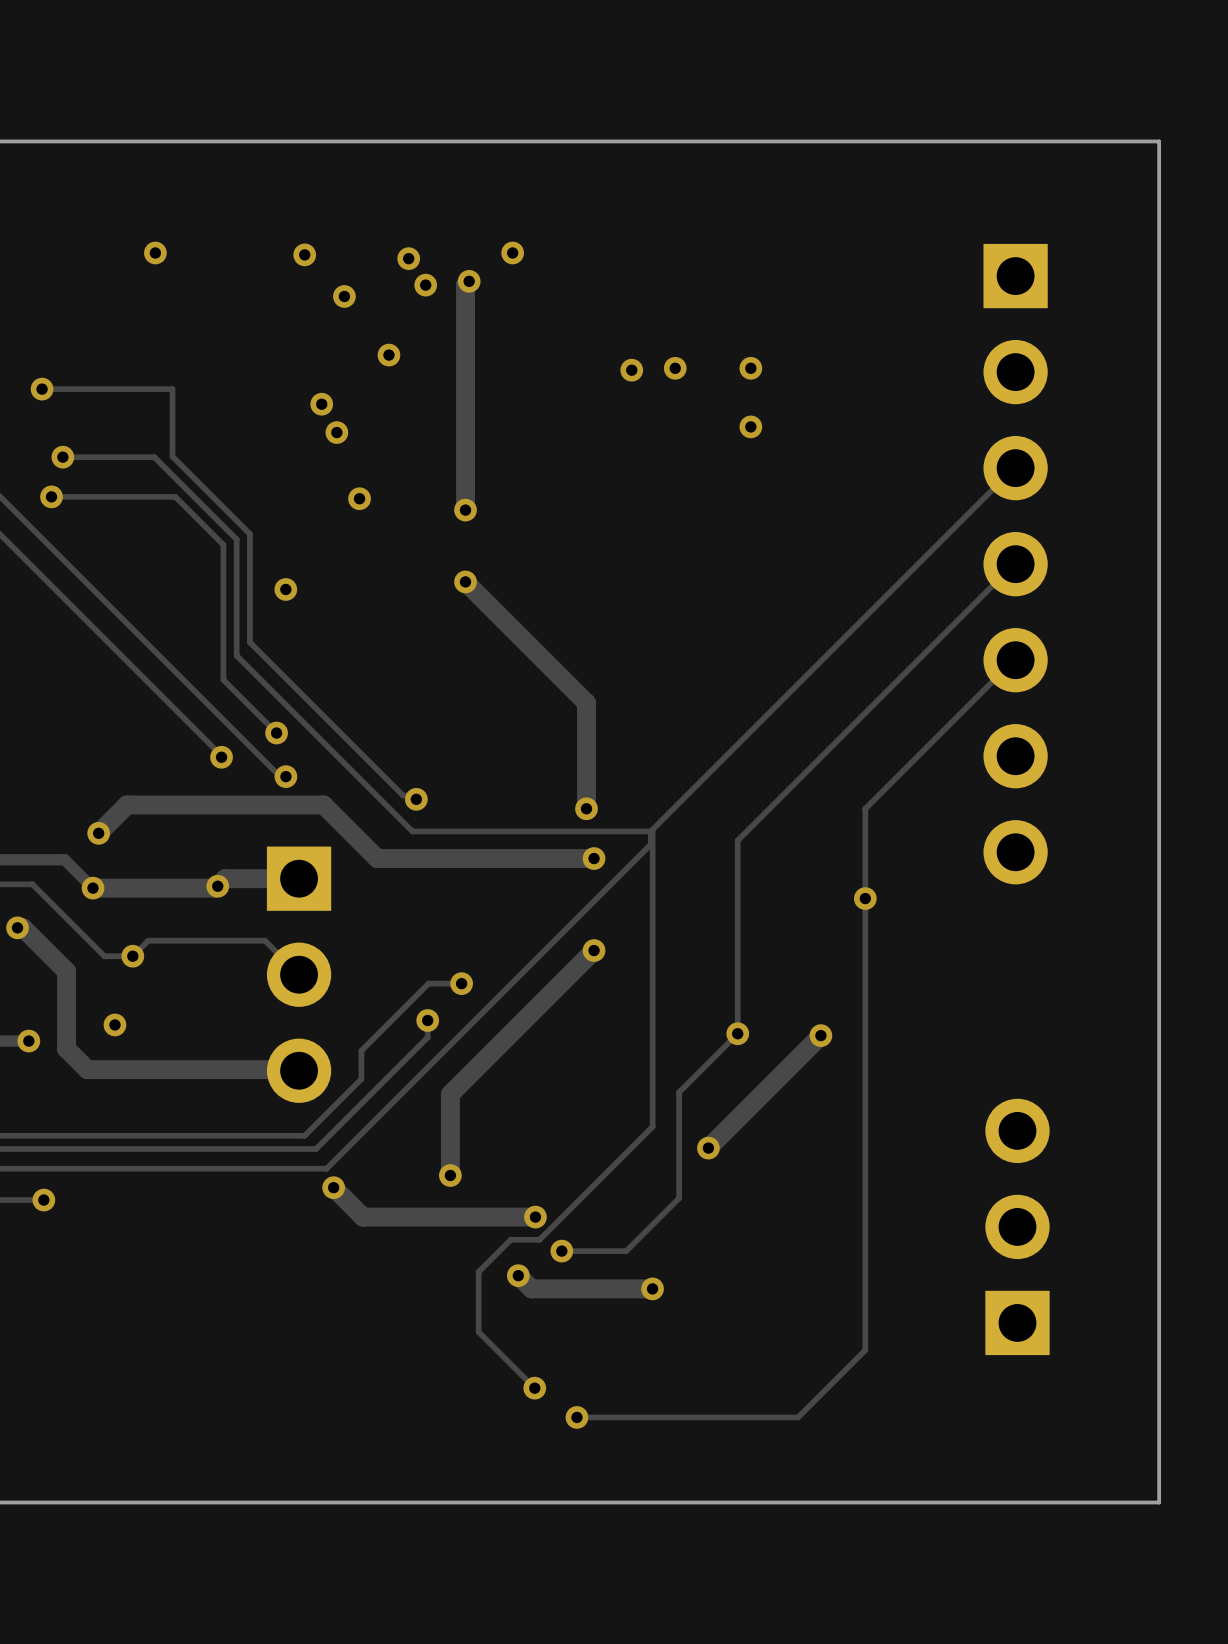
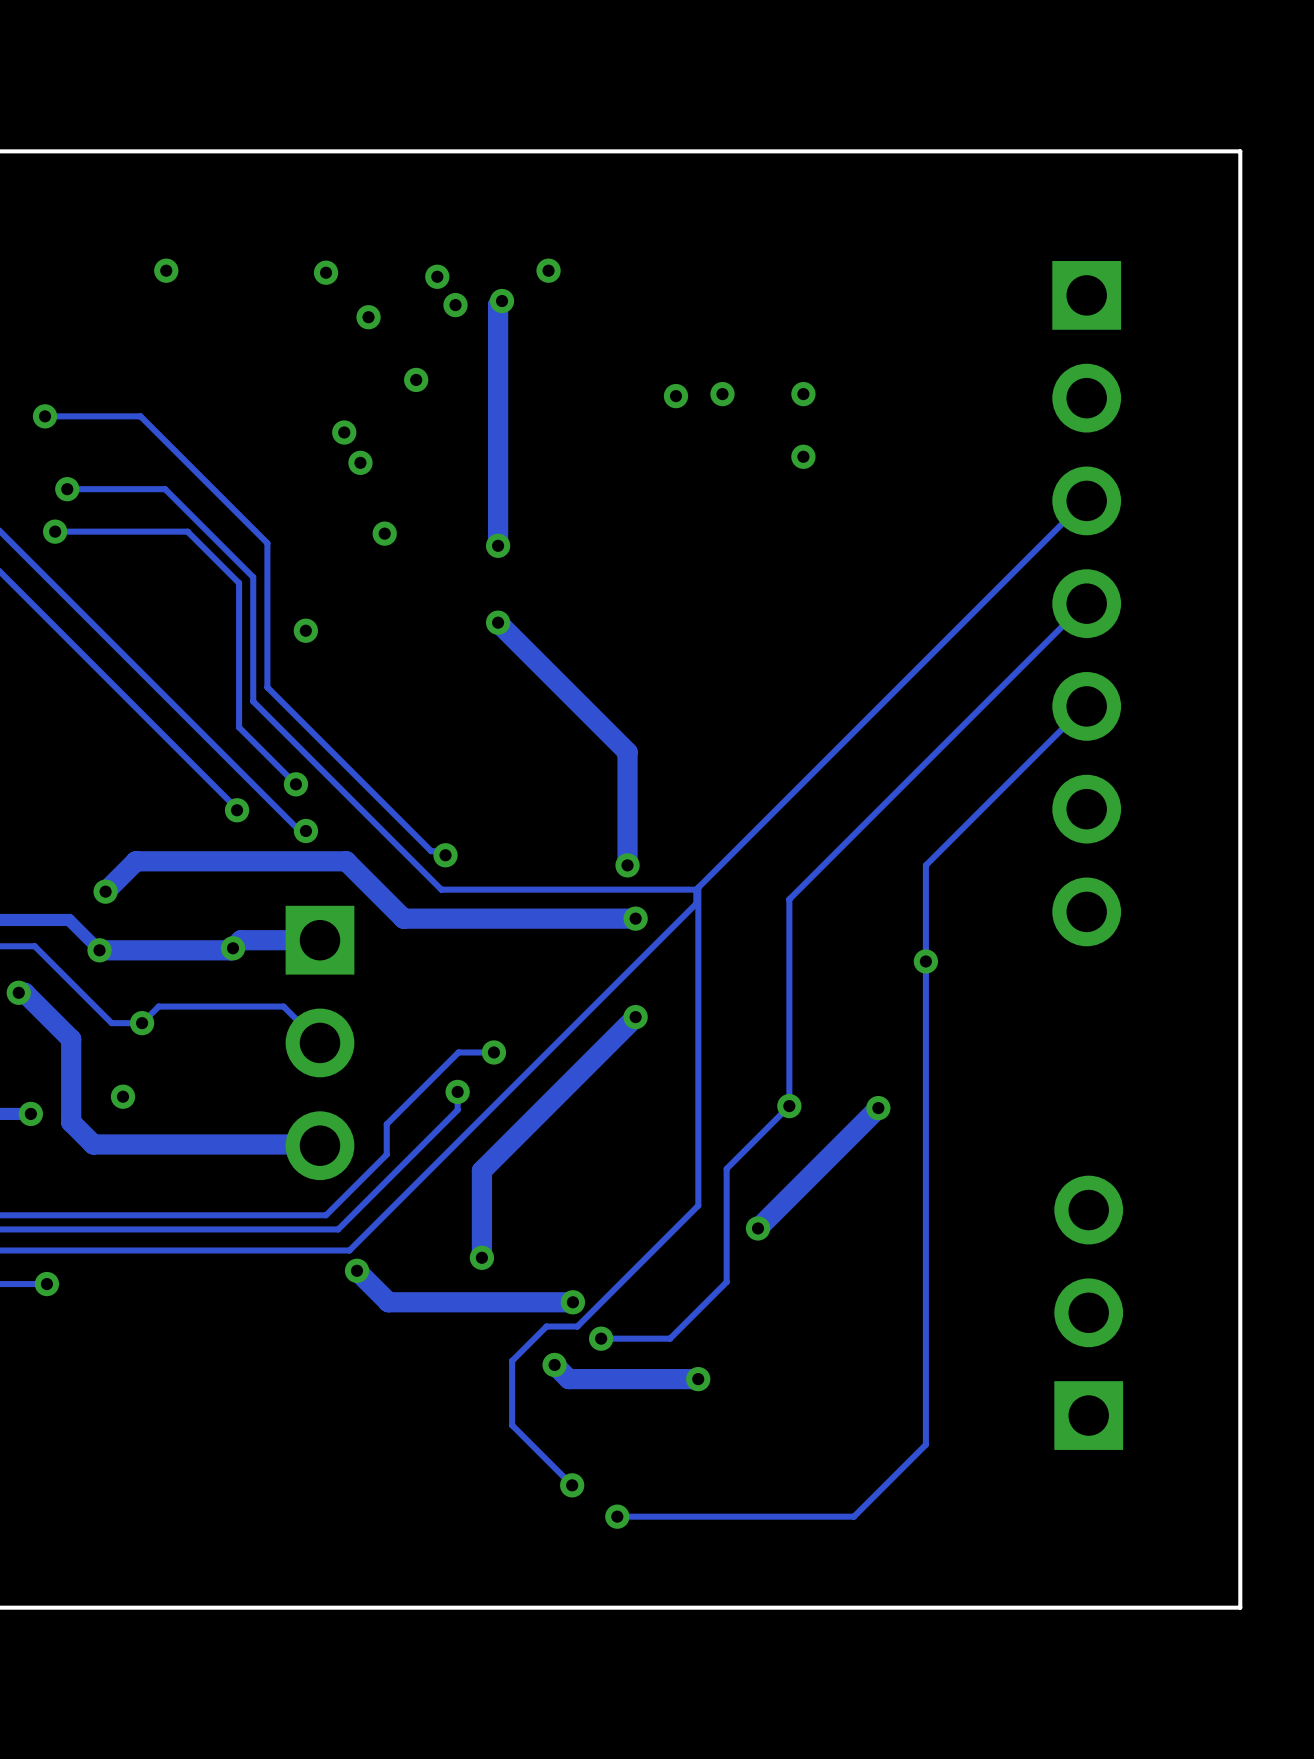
track: (131, 389) (172, 389) (172, 456) (249, 534) -> (140, 416) (267, 543) (267, 571)

